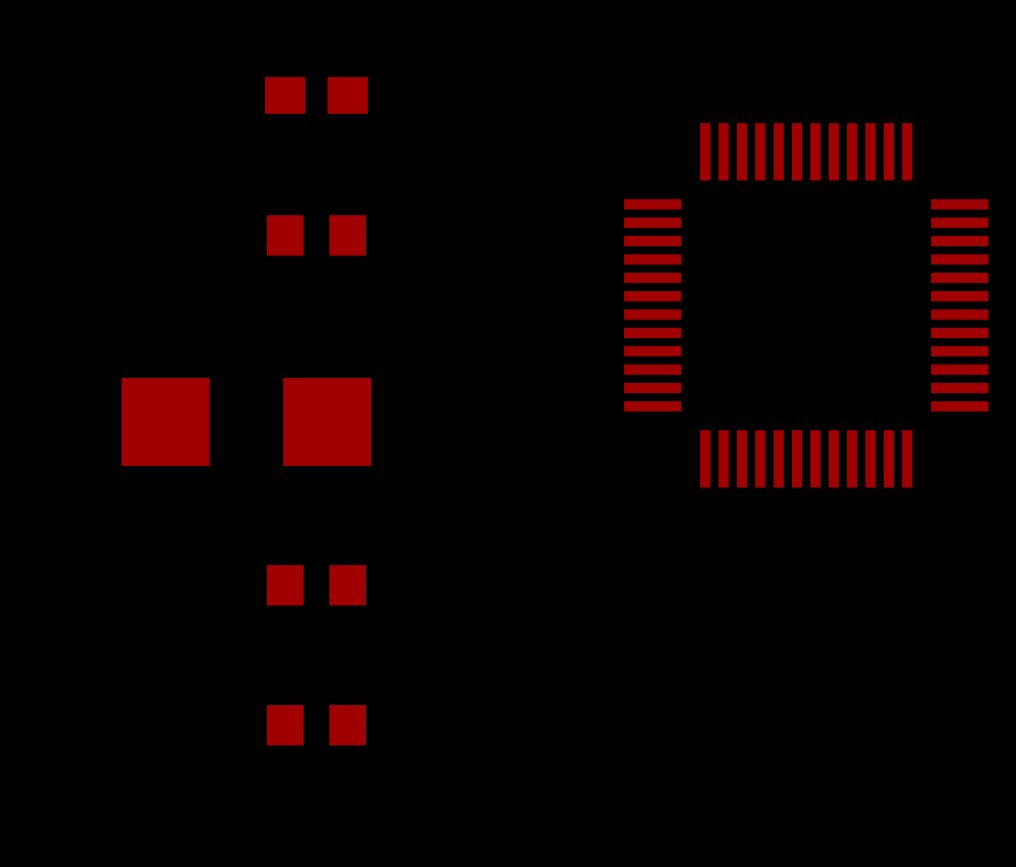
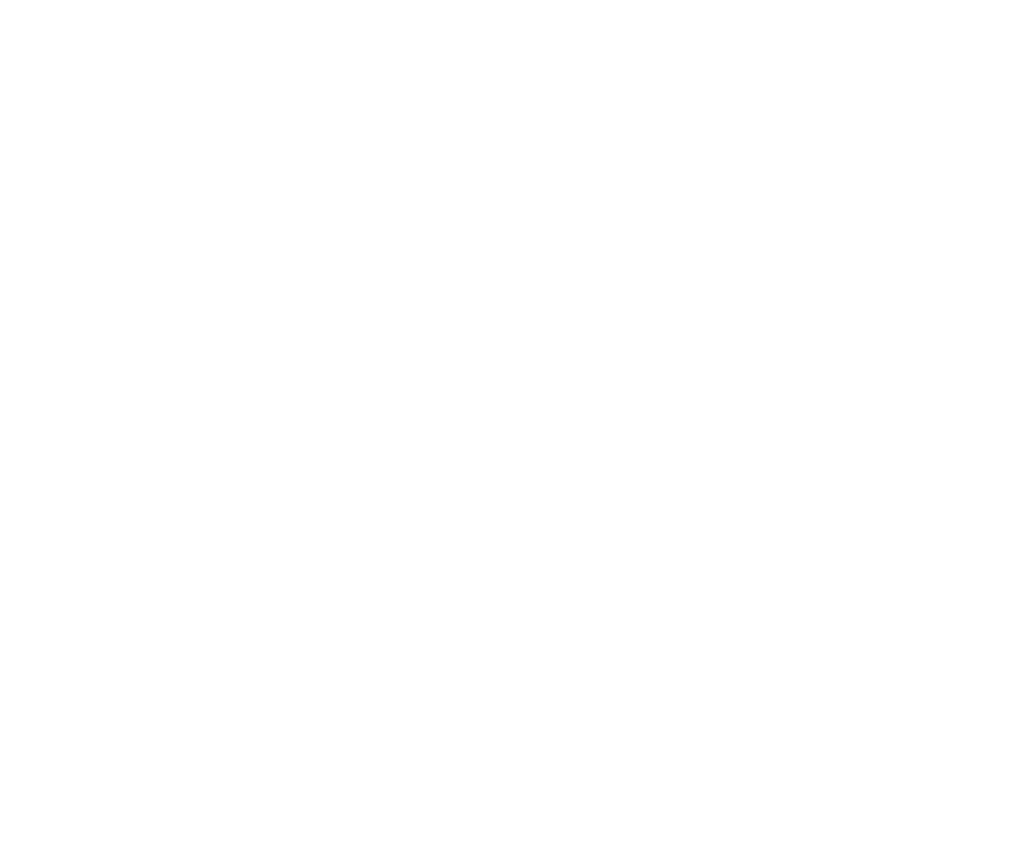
part: (316, 95) -> none
part: (316, 235) -> none
part: (806, 305) -> none
part: (246, 421) -> none
part: (316, 585) -> none
part: (316, 725) -> none

